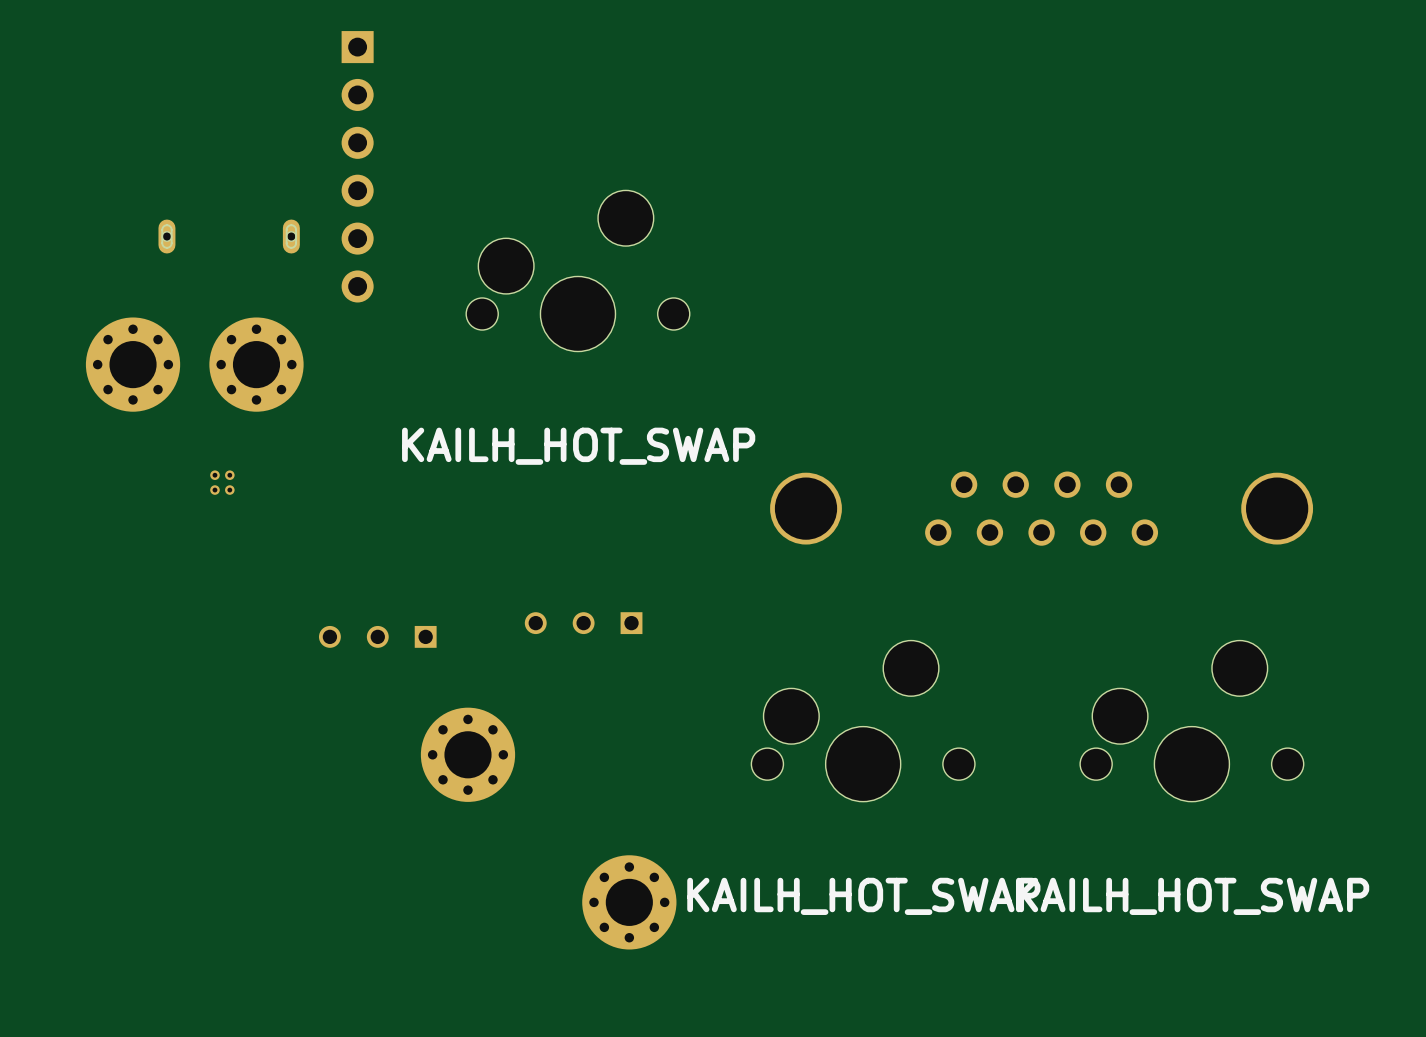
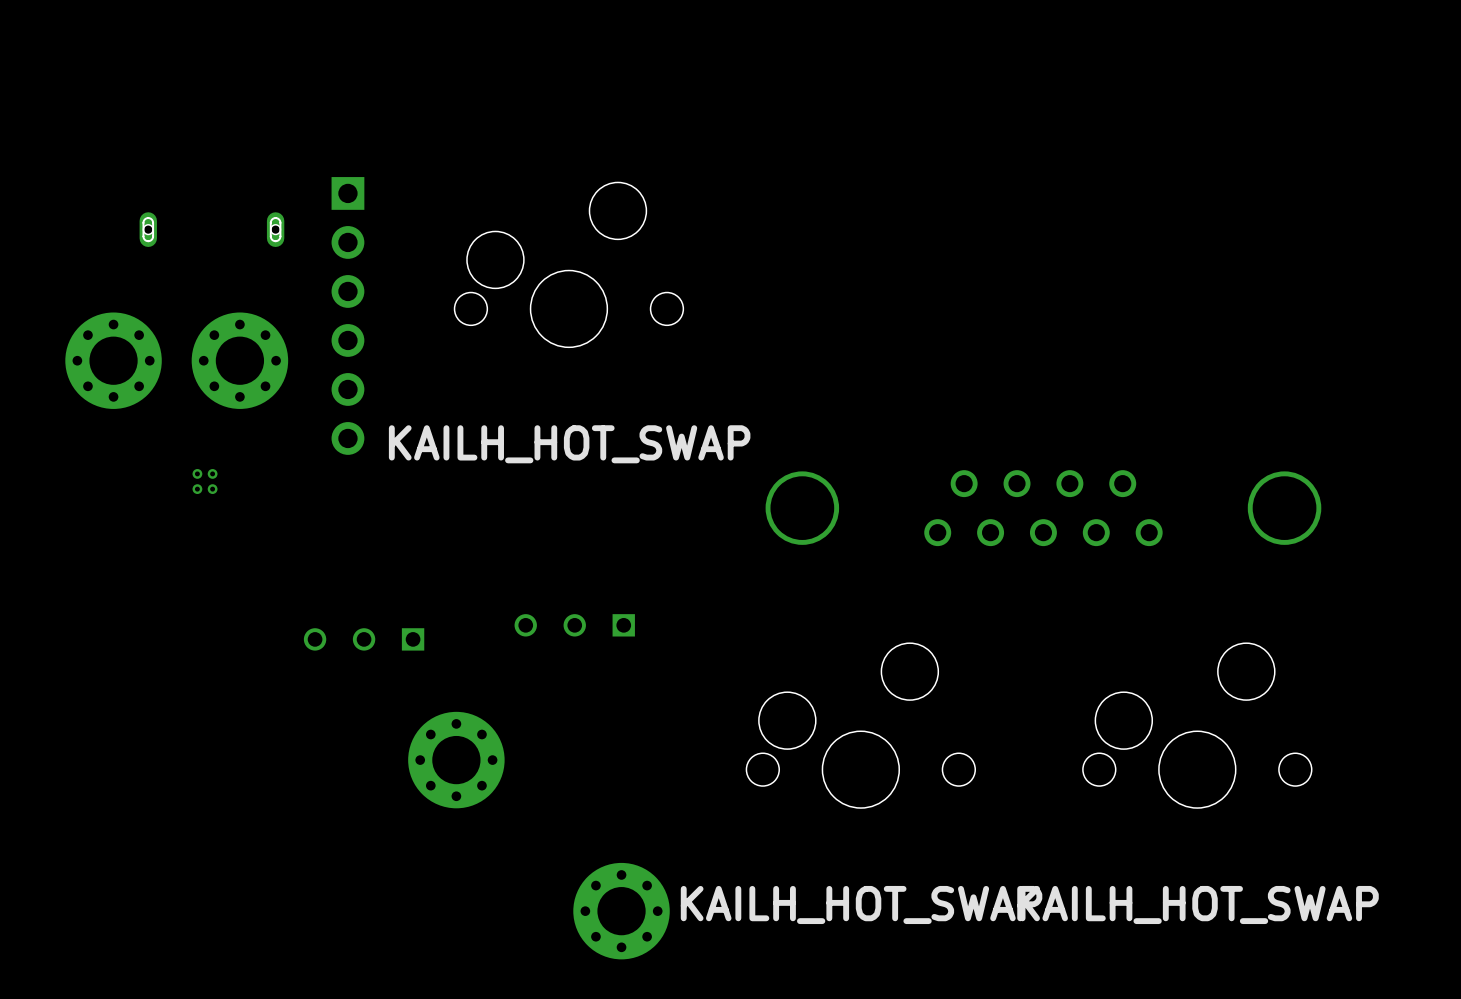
part position: (357, 166) -> (347, 315)

